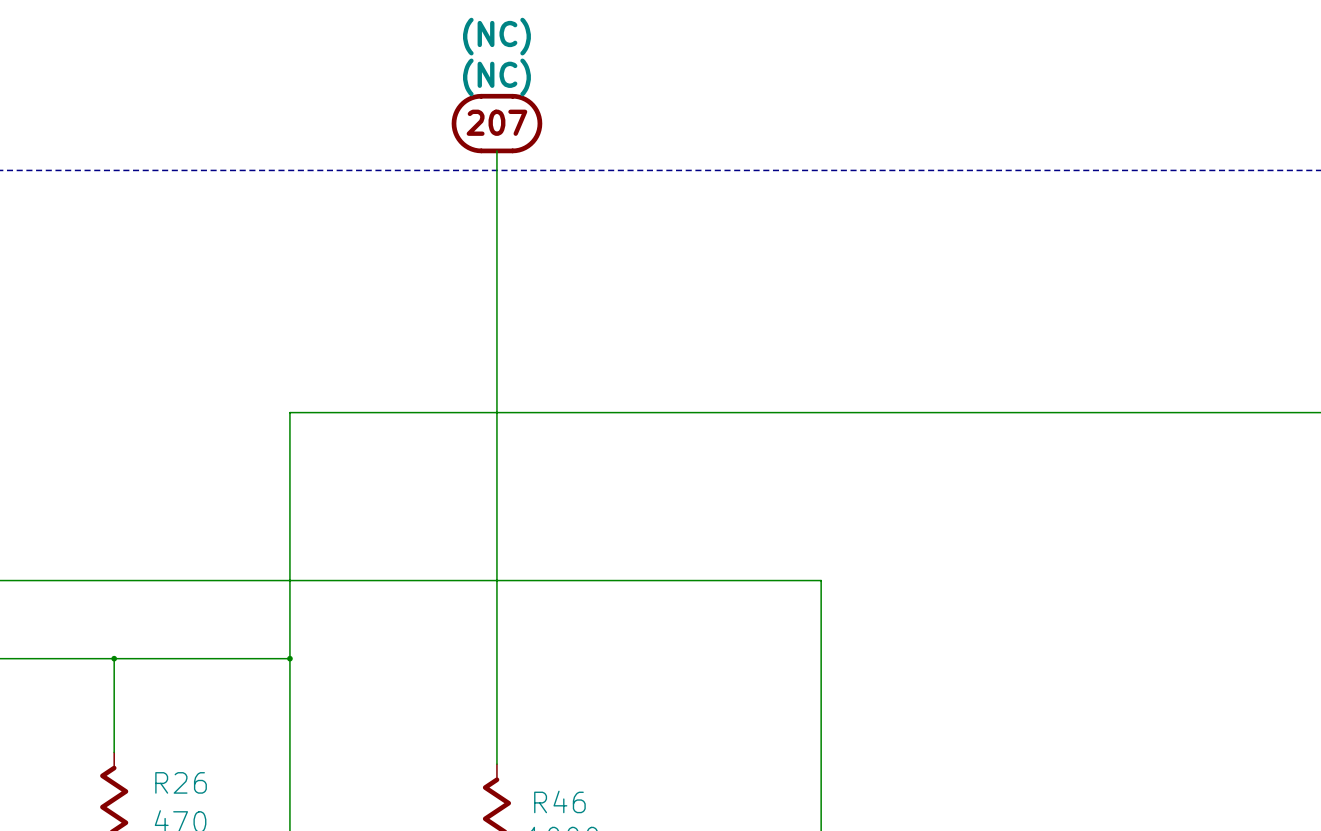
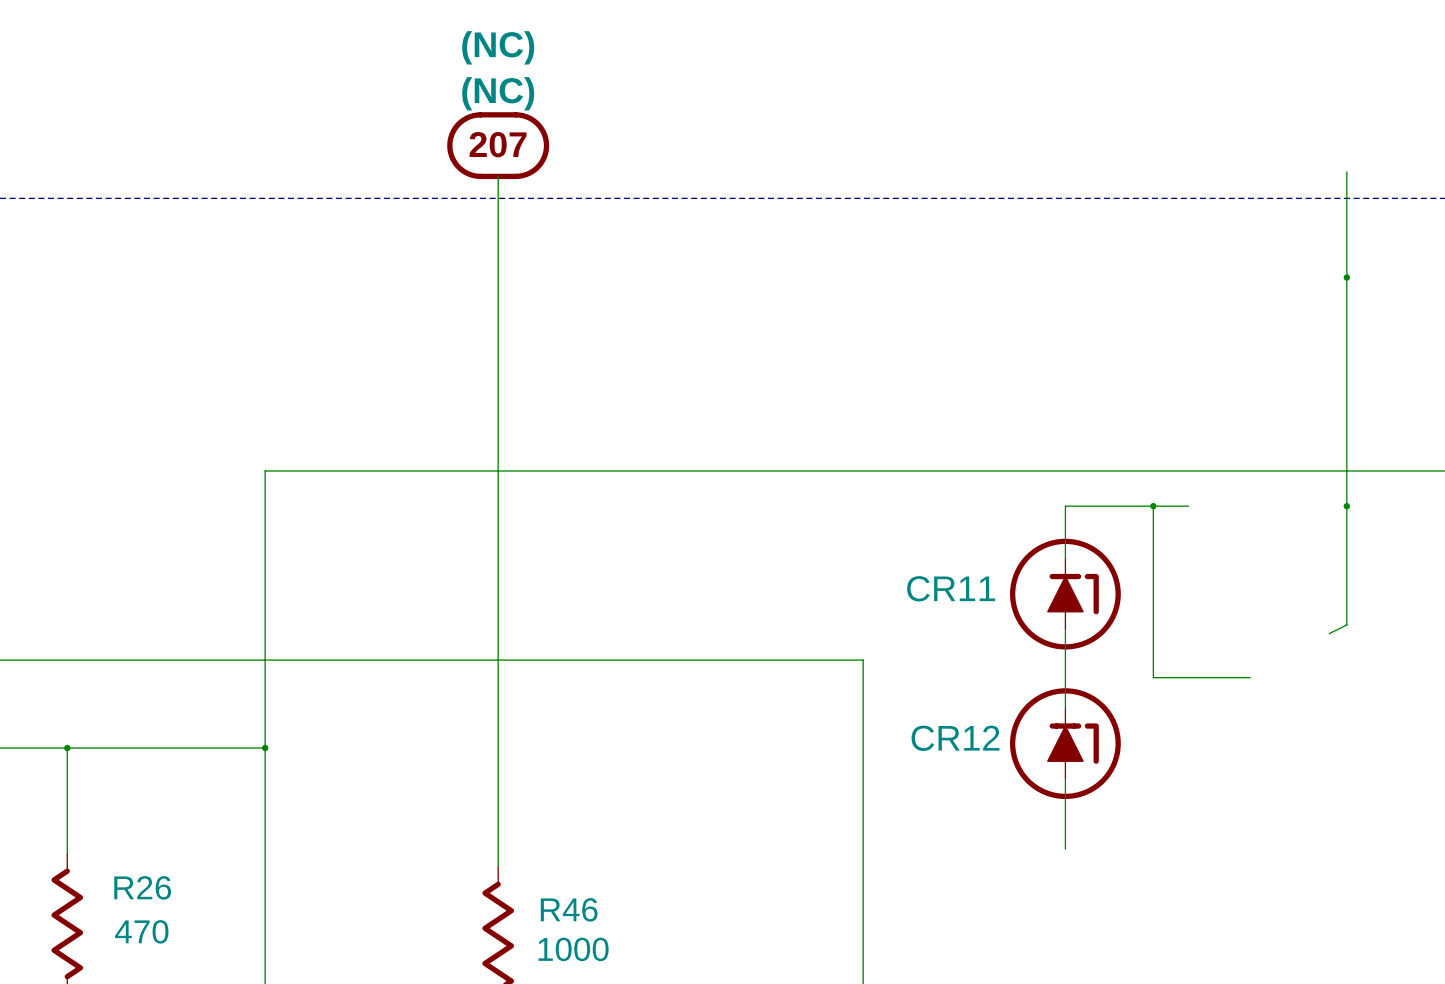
wire: none -> (1346, 172) (1346, 624) (1329, 633)
junction: none -> (1346, 277)
wire: none -> (1153, 506) (1153, 677) (1250, 677)
junction: none -> (1153, 506)
wire: none -> (1188, 506) (1065, 506) (1065, 558)
junction: none -> (1346, 506)
CR11: none -> (1065, 594)
wire: none -> (1065, 629) (1065, 708)
CR12: none -> (1065, 743)
wire: none -> (1065, 778) (1065, 849)

